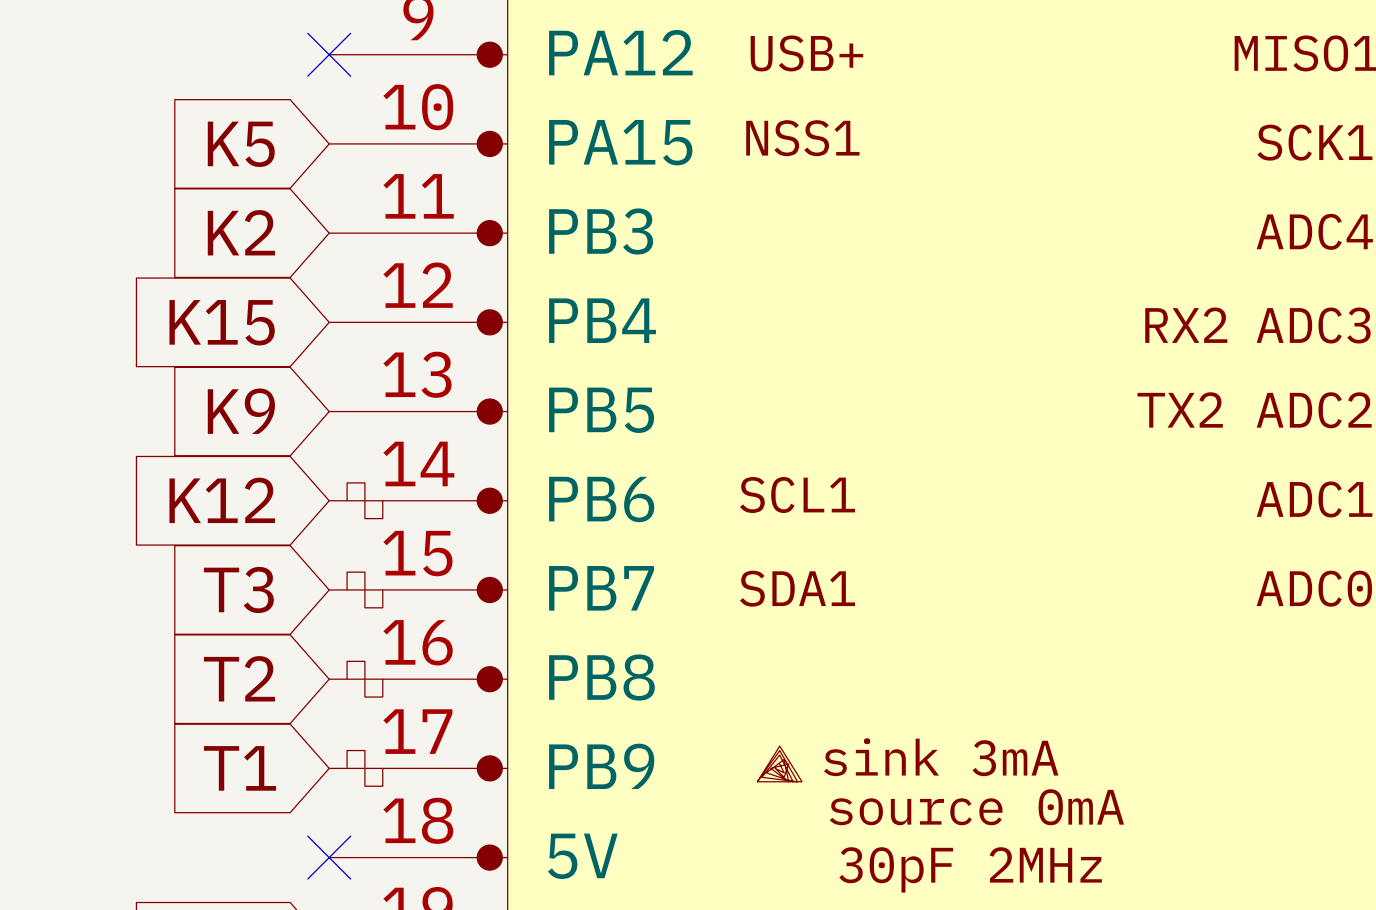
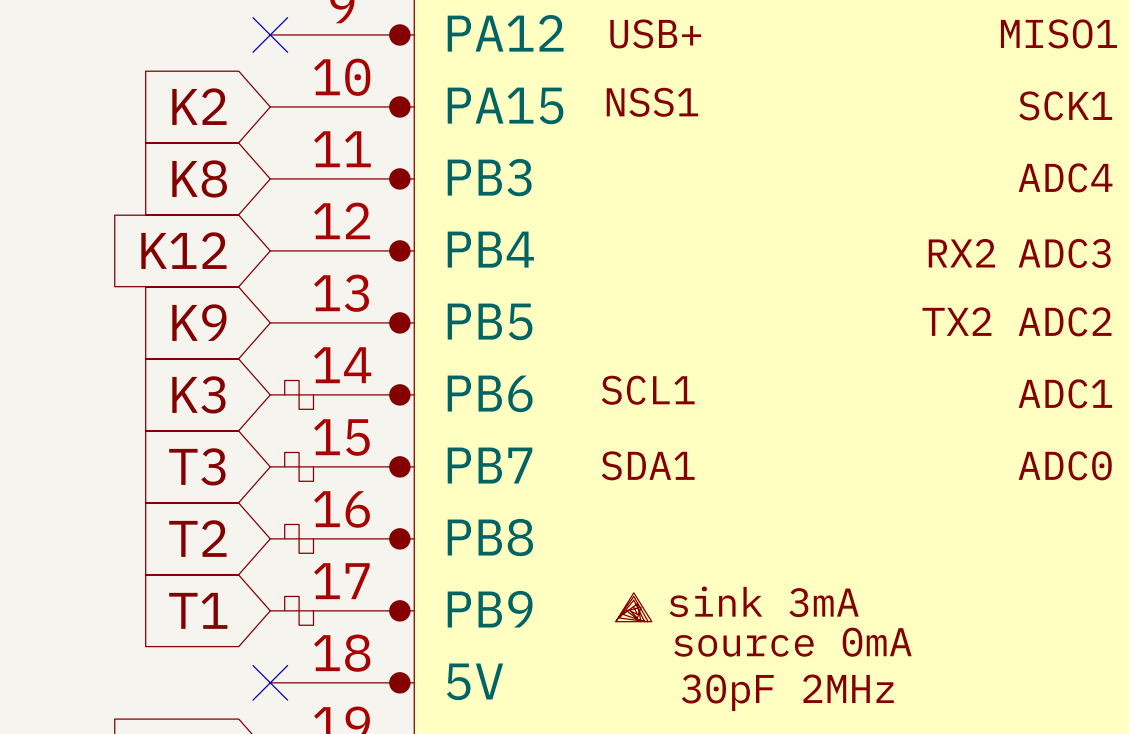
global label: K5 (241, 144) -> K2 (199, 106)
global label: K2 (241, 232) -> K8 (199, 178)
global label: K15 (222, 322) -> K12 (183, 250)
global label: K12 (222, 500) -> K3 (198, 394)

